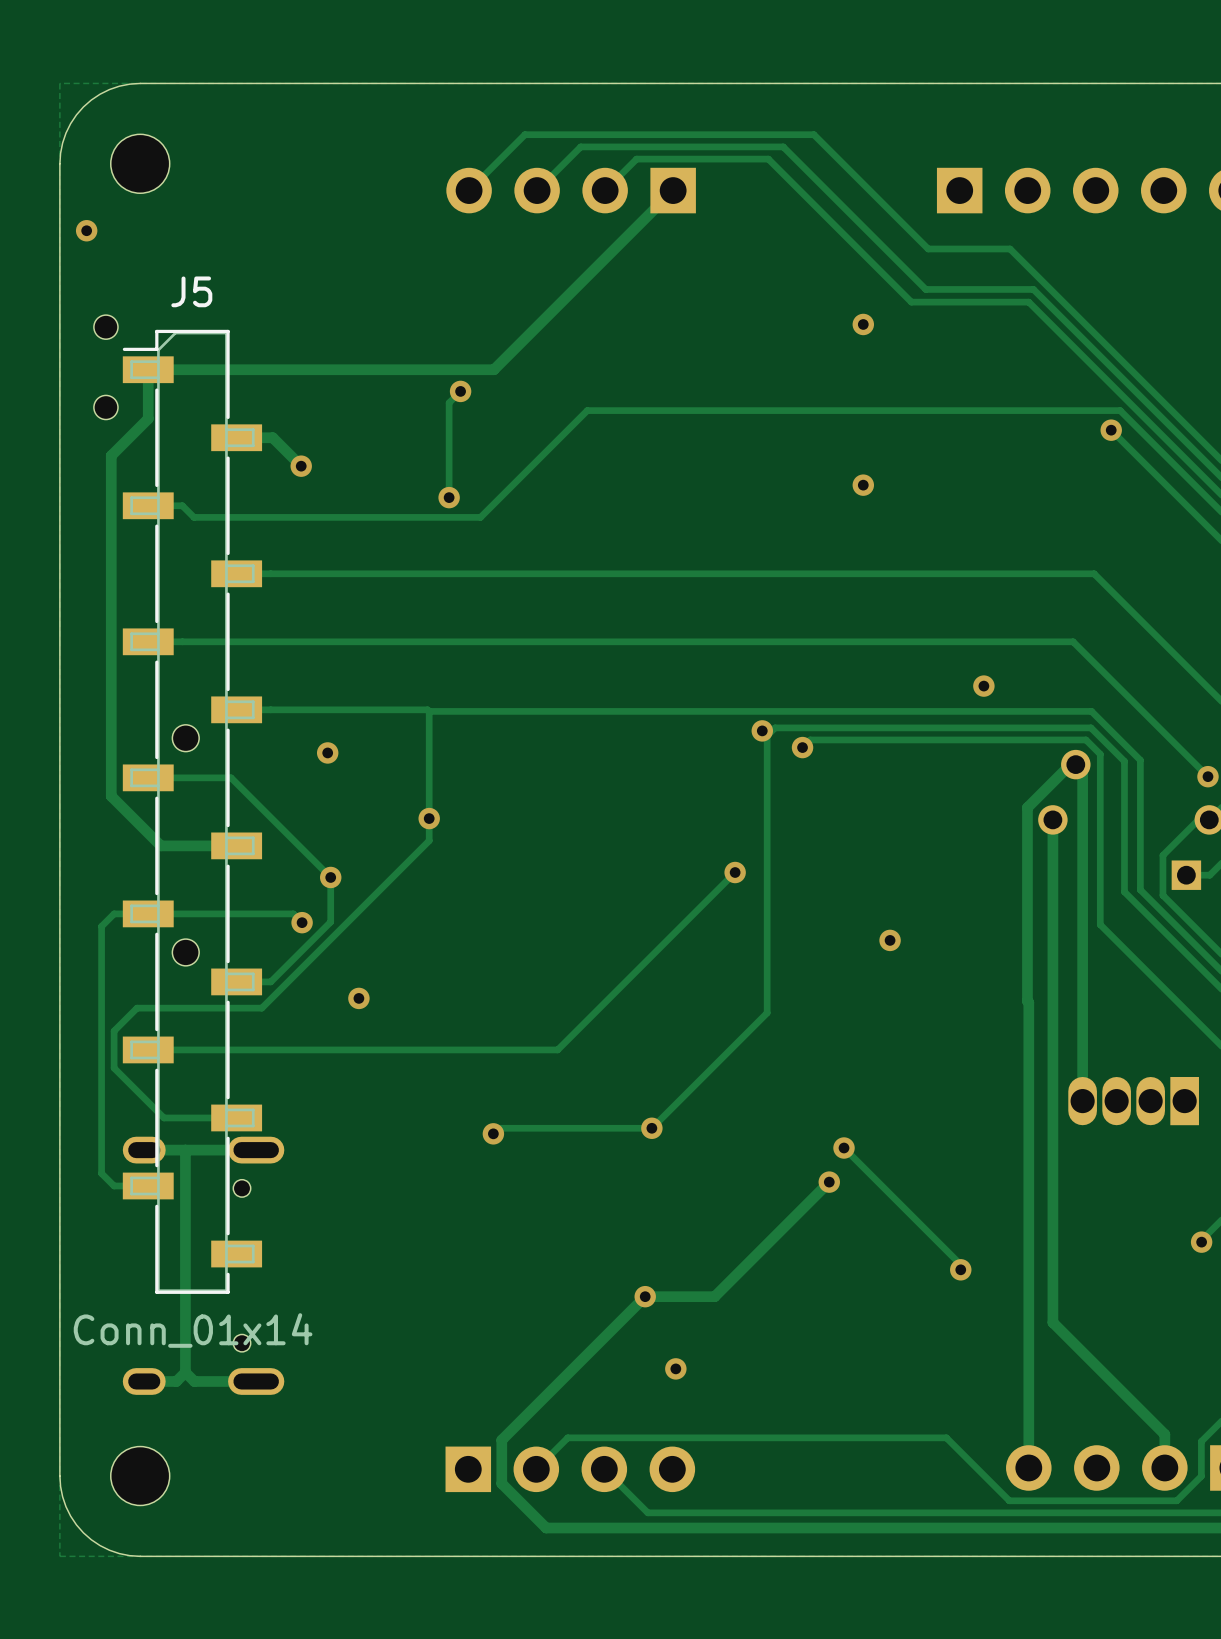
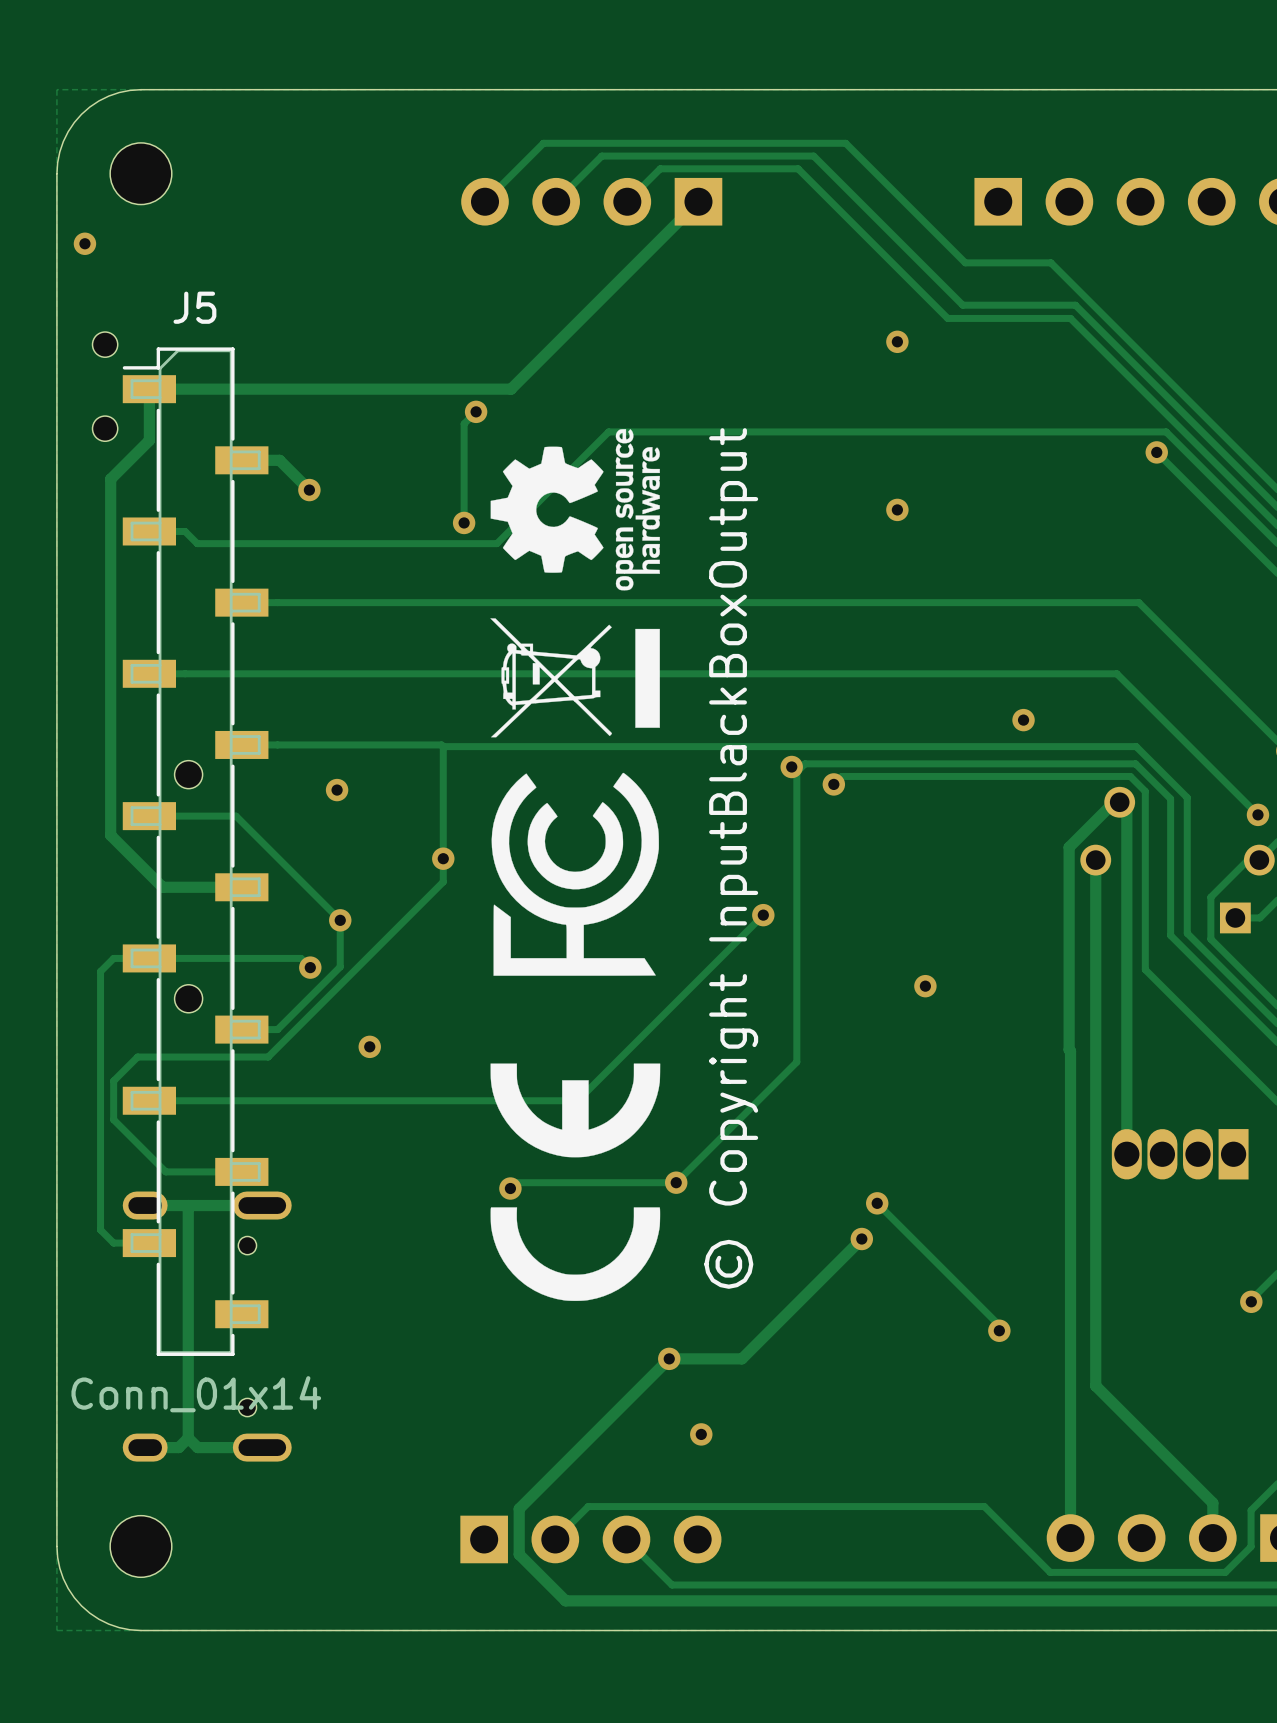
drawing: none -> [490, 429, 660, 738]
drawing: none -> [491, 772, 659, 976]
text: none -> © Copyright InputBlackBoxOutput (731, 858)
drawing: none -> [490, 1063, 661, 1301]

